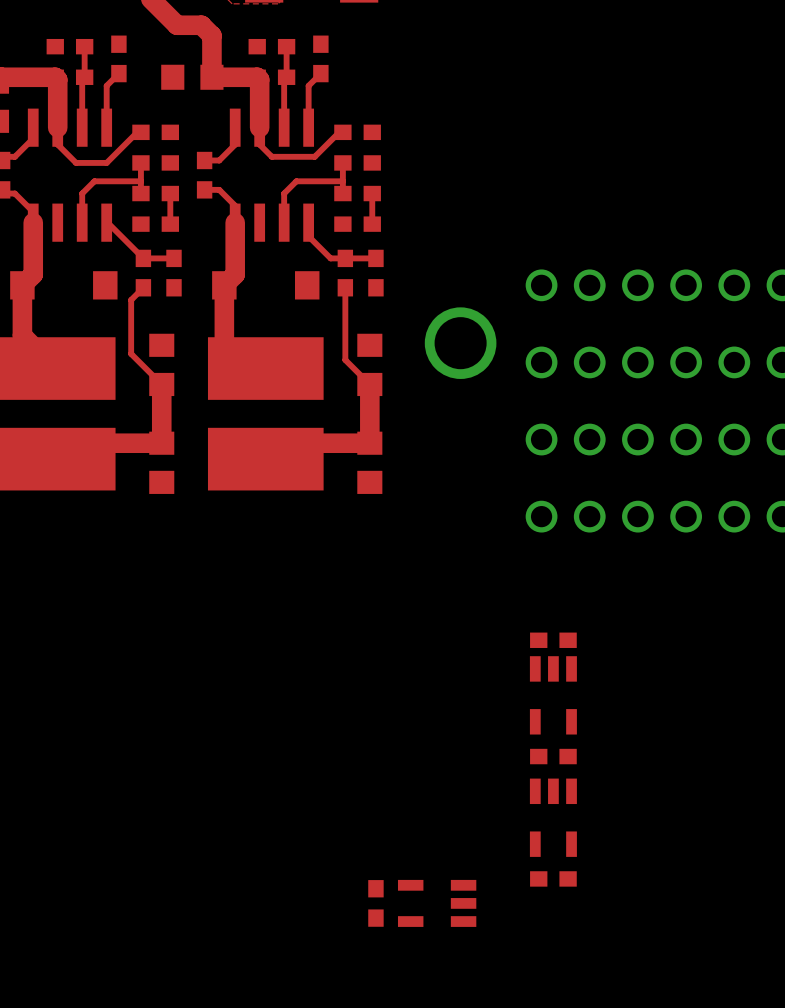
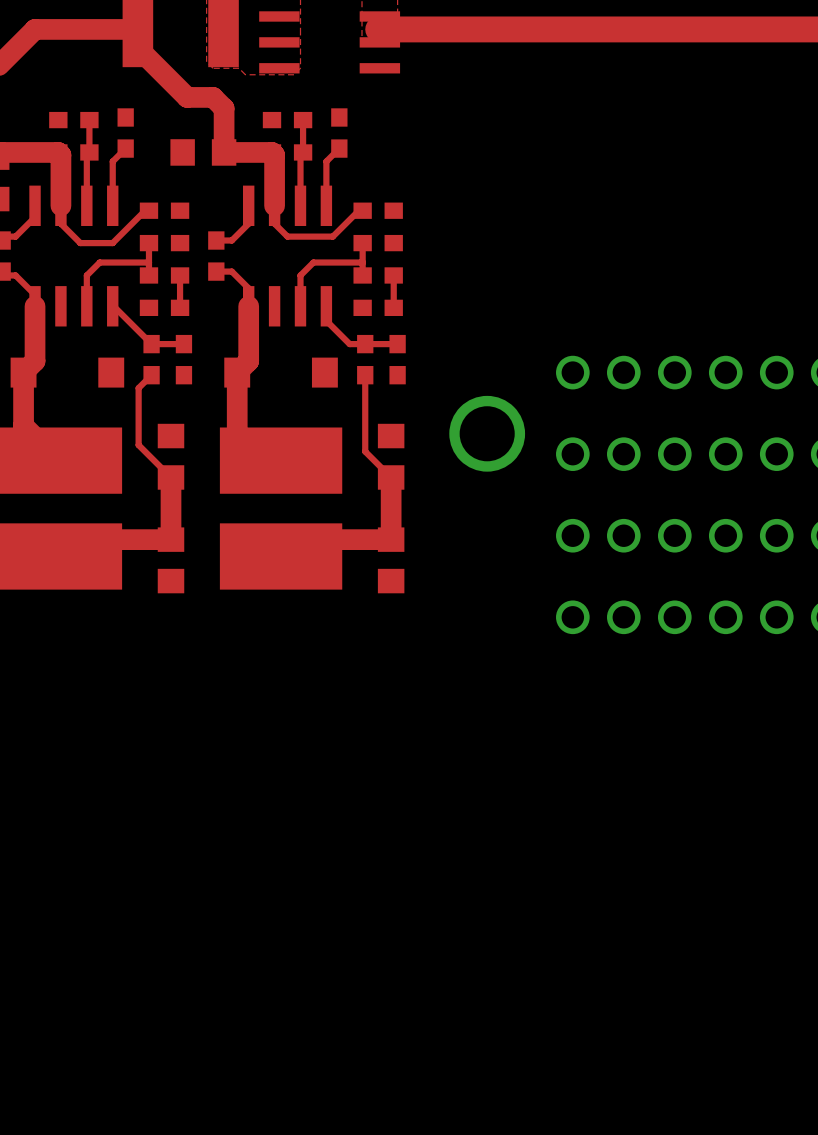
part: (553, 640) -> none
part: (553, 695) -> none
part: (553, 756) -> none
part: (553, 817) -> none
part: (553, 878) -> none
part: (375, 903) -> none
part: (437, 903) -> none

